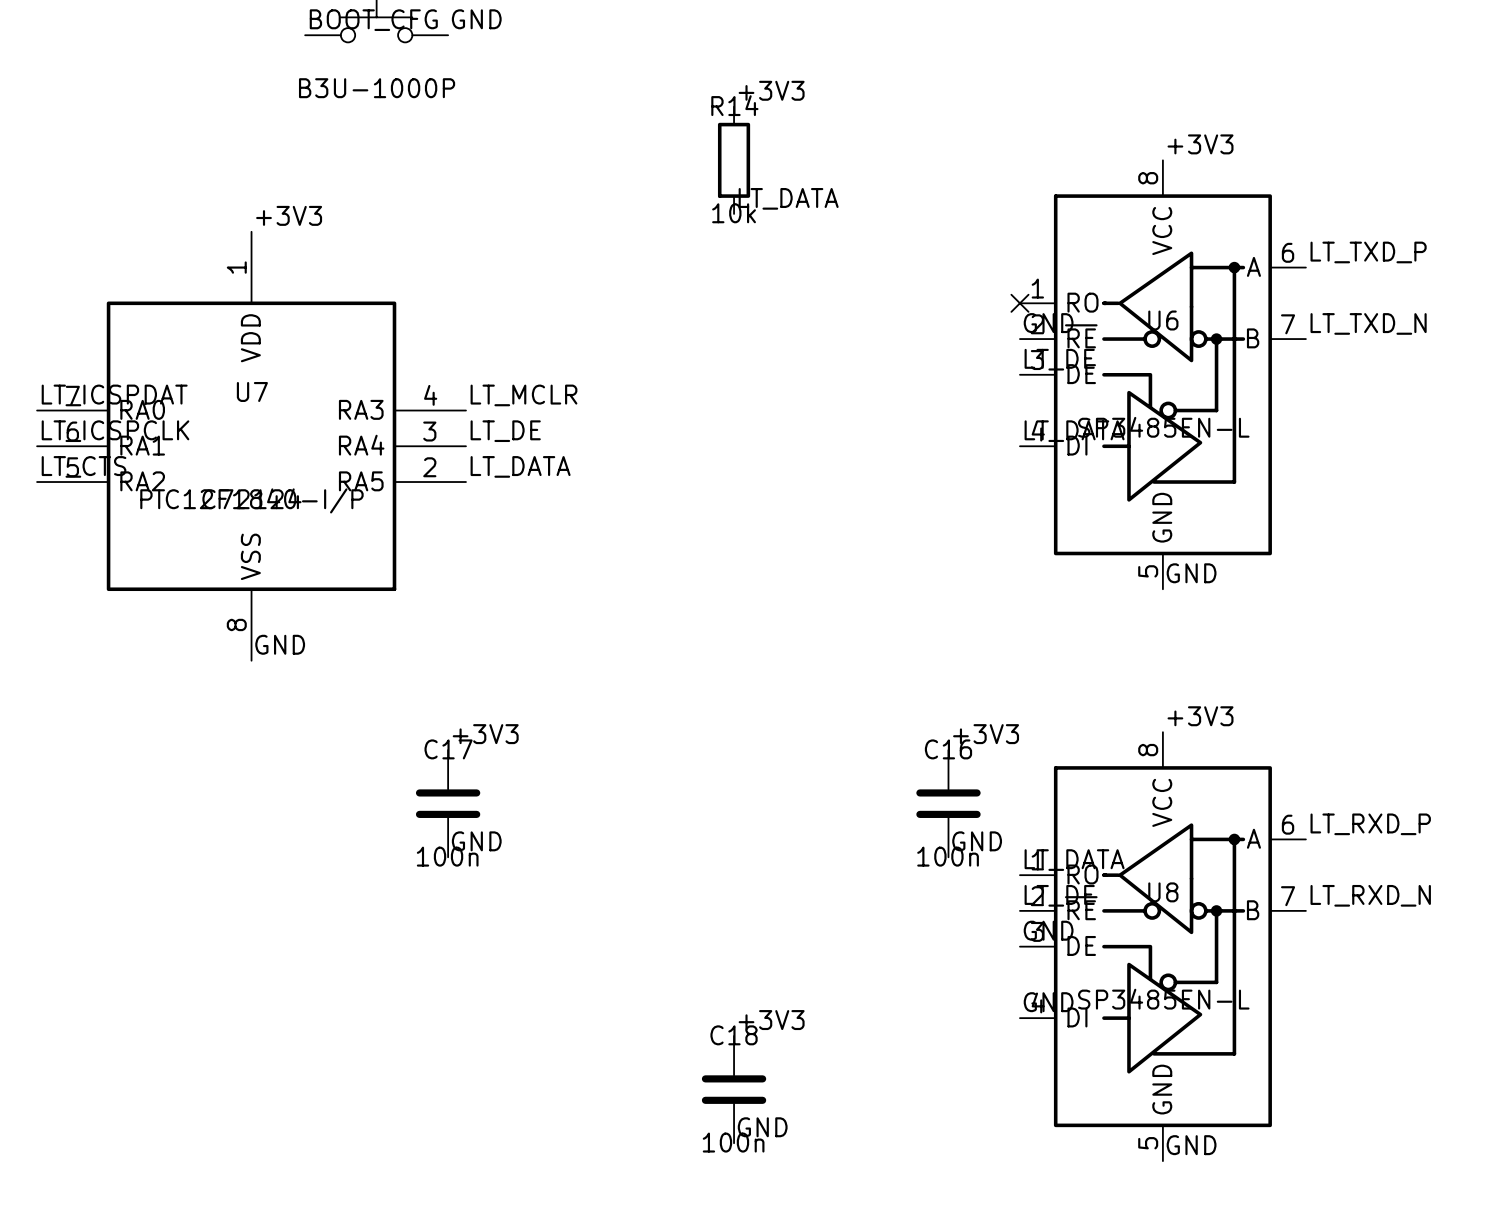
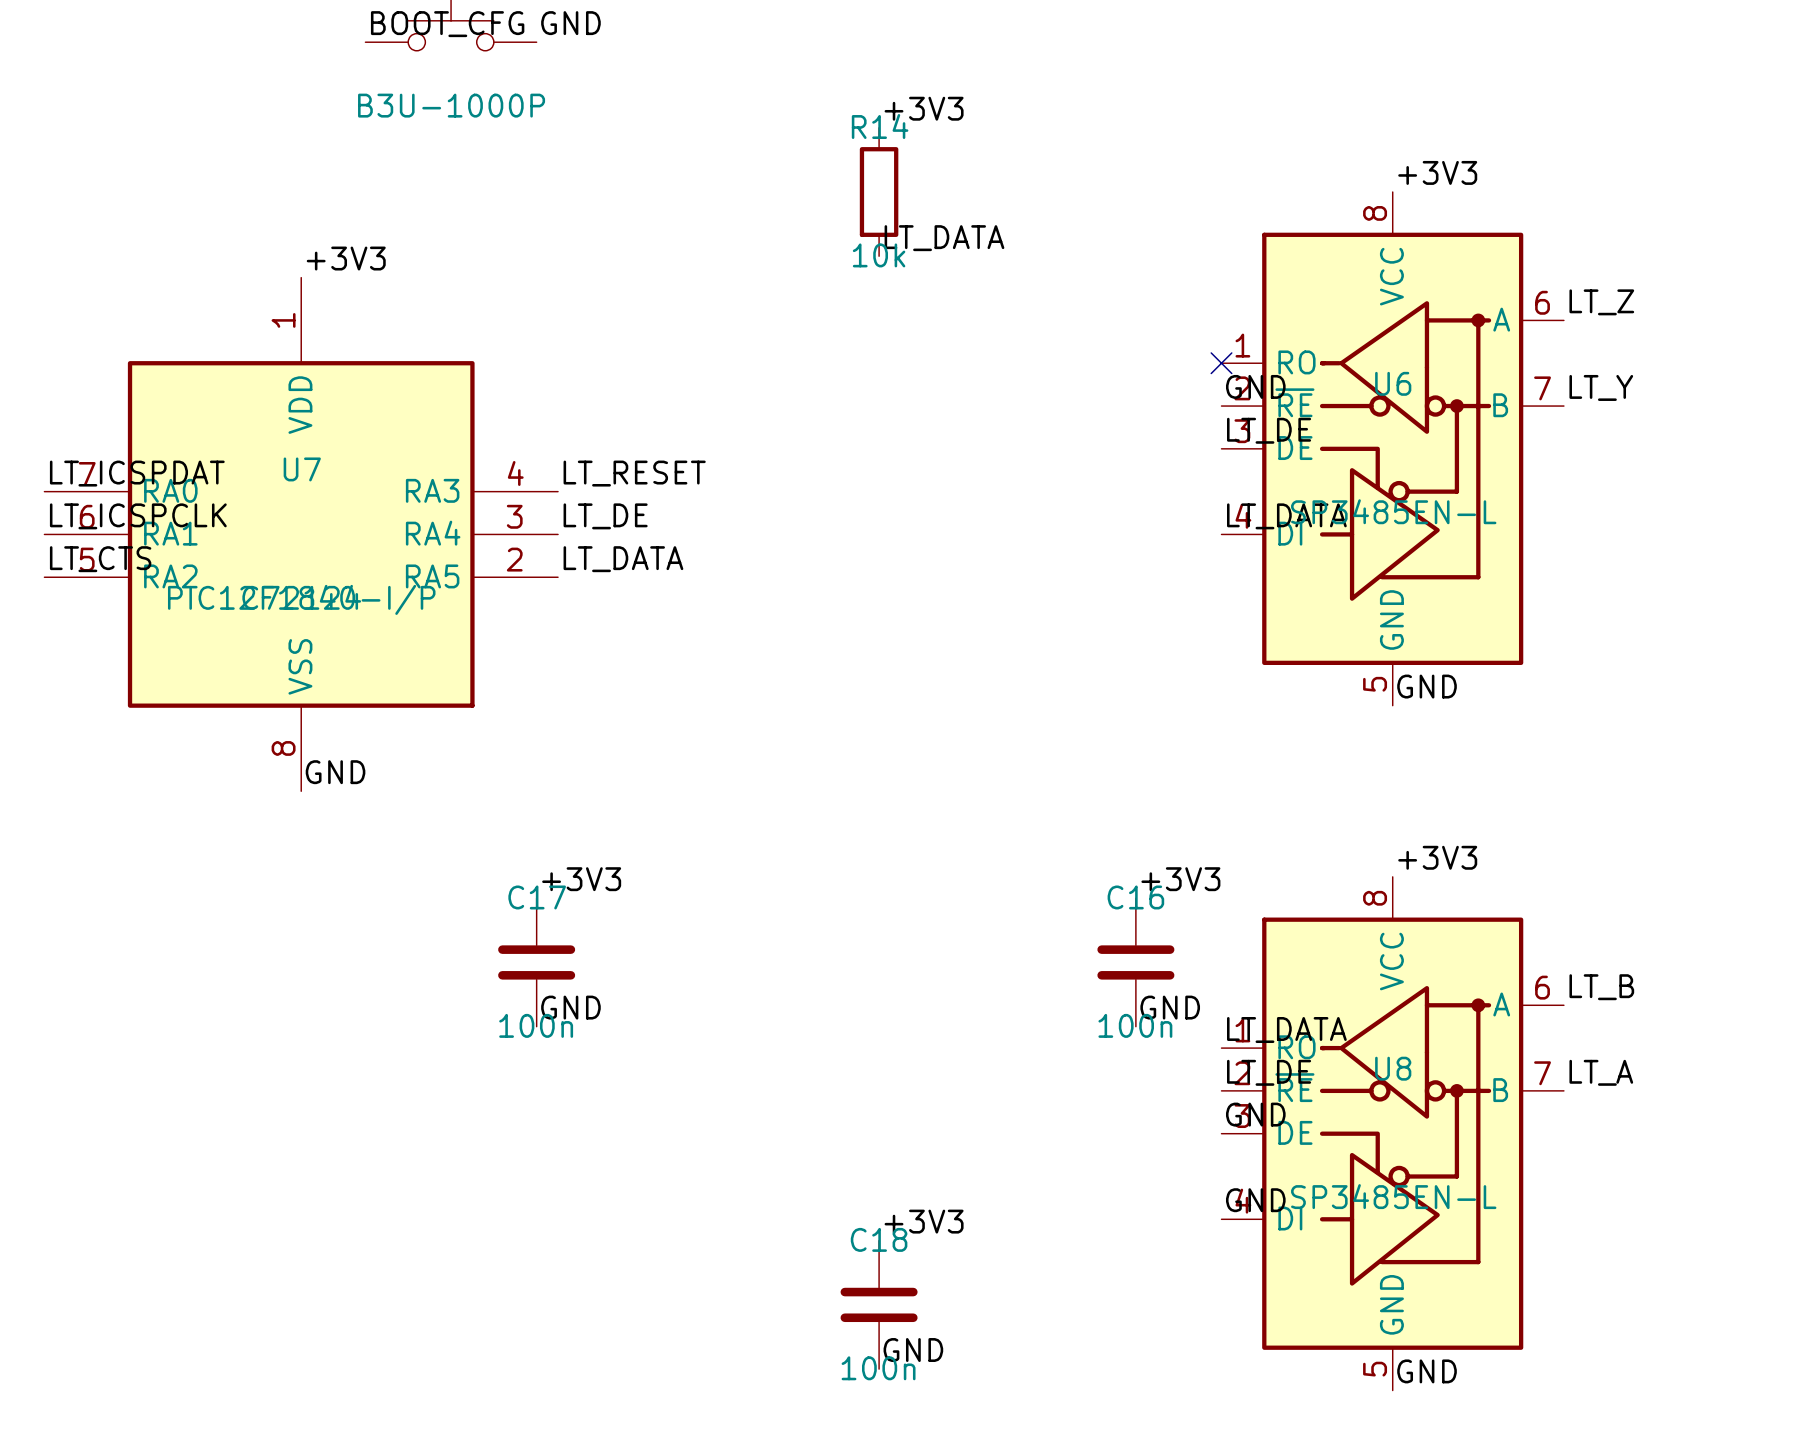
label: LT_TXD_P (1368, 252) -> LT_Z (1601, 302)
label: LT_TXD_N (1368, 323) -> LT_Y (1601, 387)
label: LT_MCLR (523, 395) -> LT_RESET (634, 473)
label: LT_RXD_P (1370, 824) -> LT_B (1601, 987)
label: LT_RXD_N (1370, 895) -> LT_A (1601, 1072)

